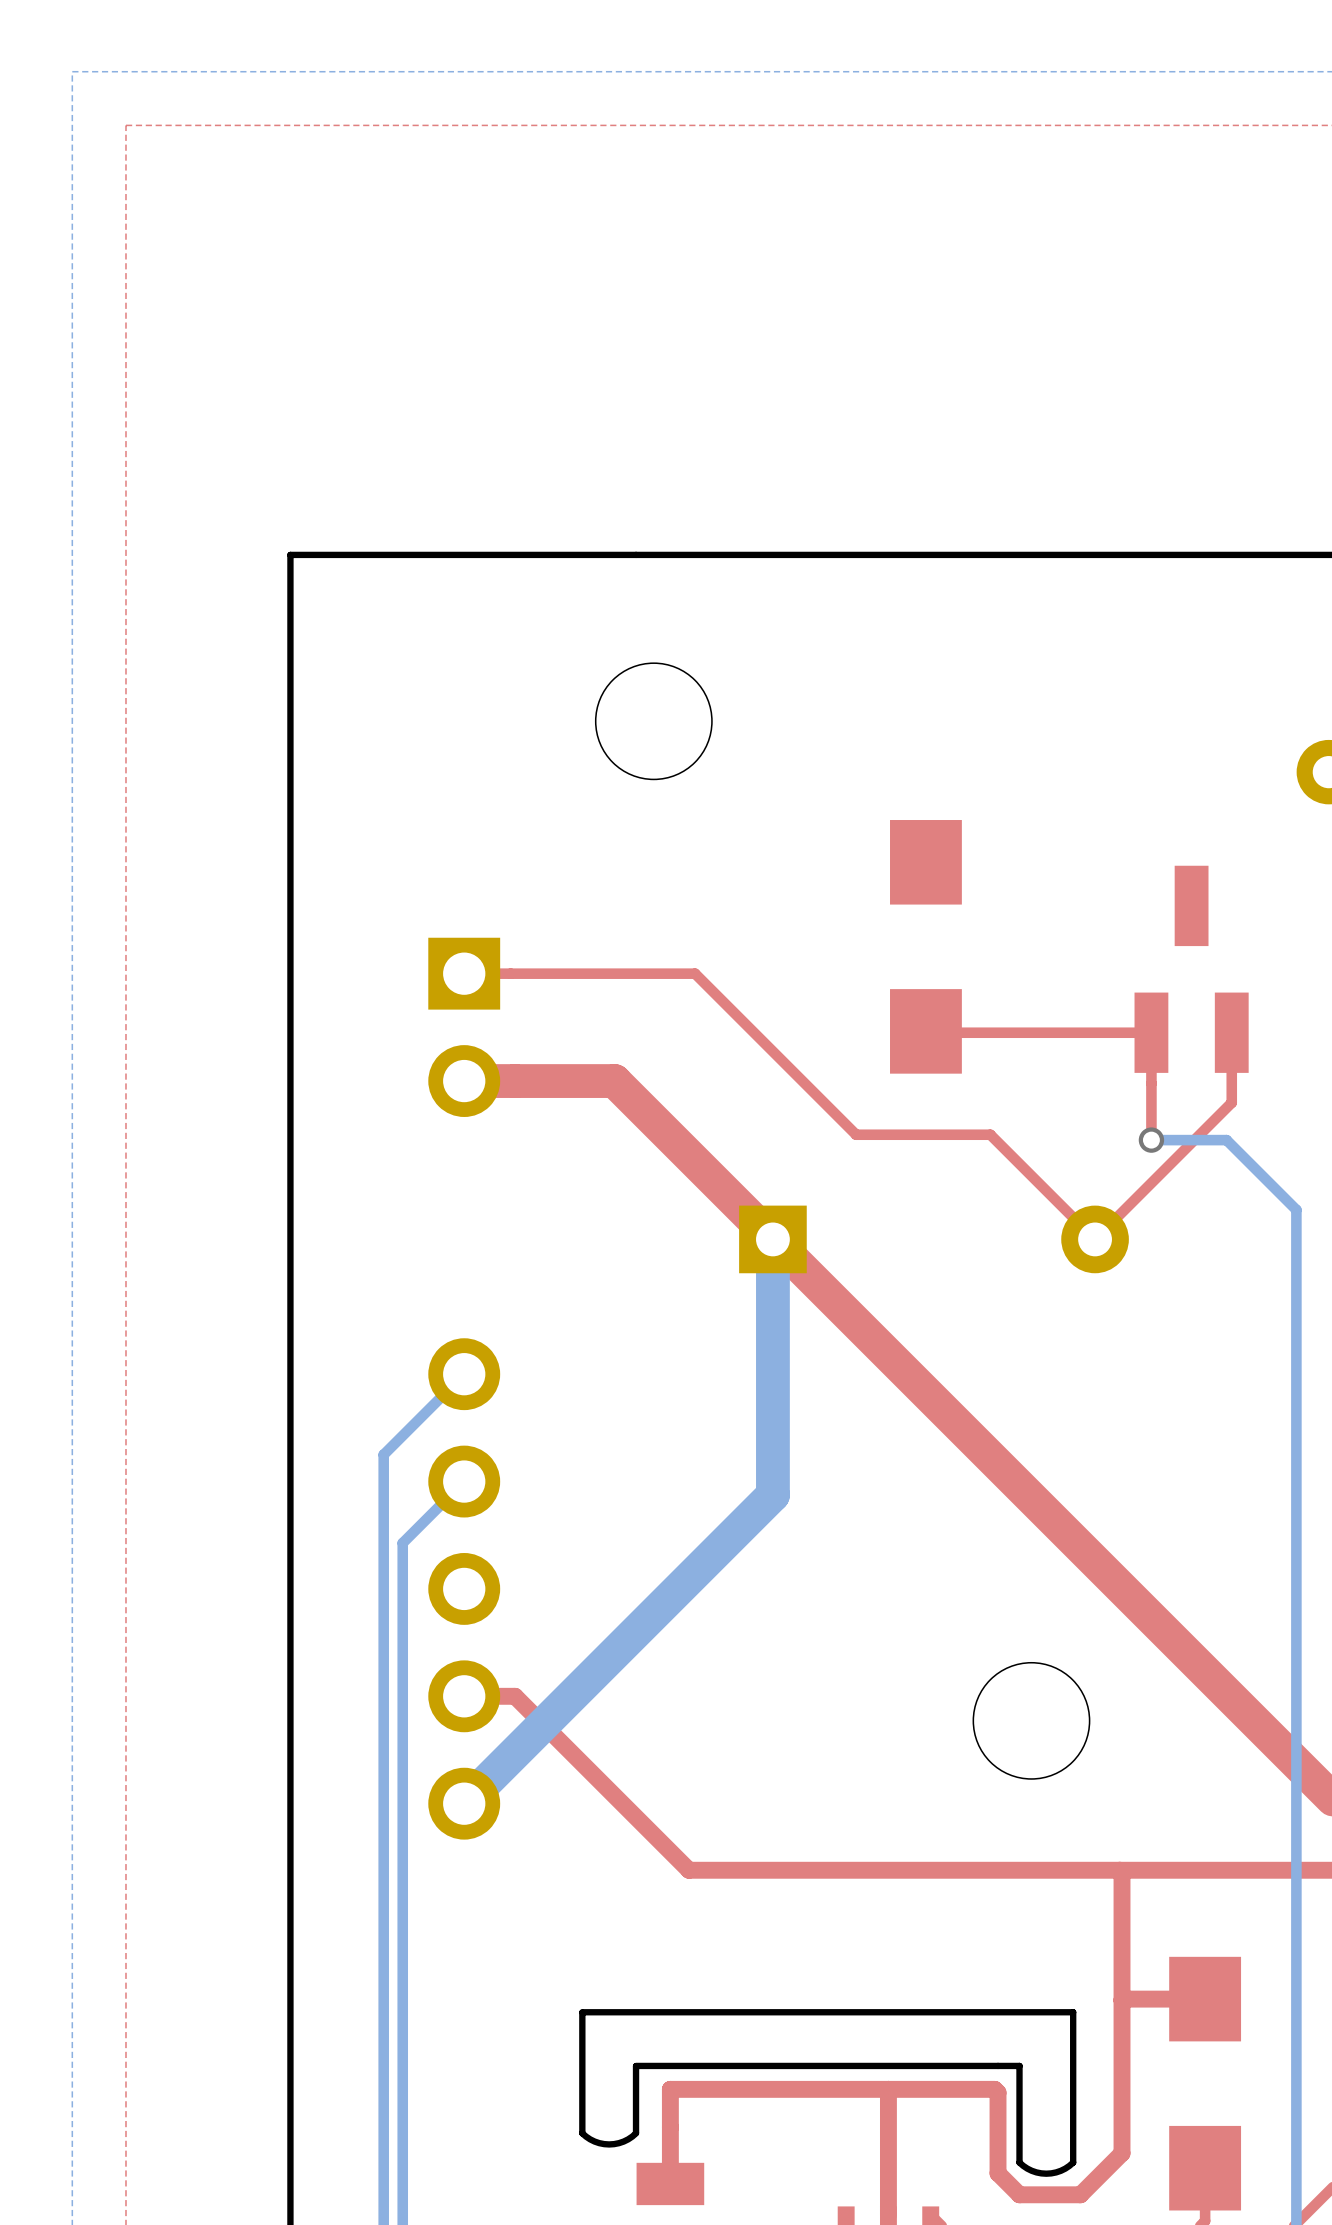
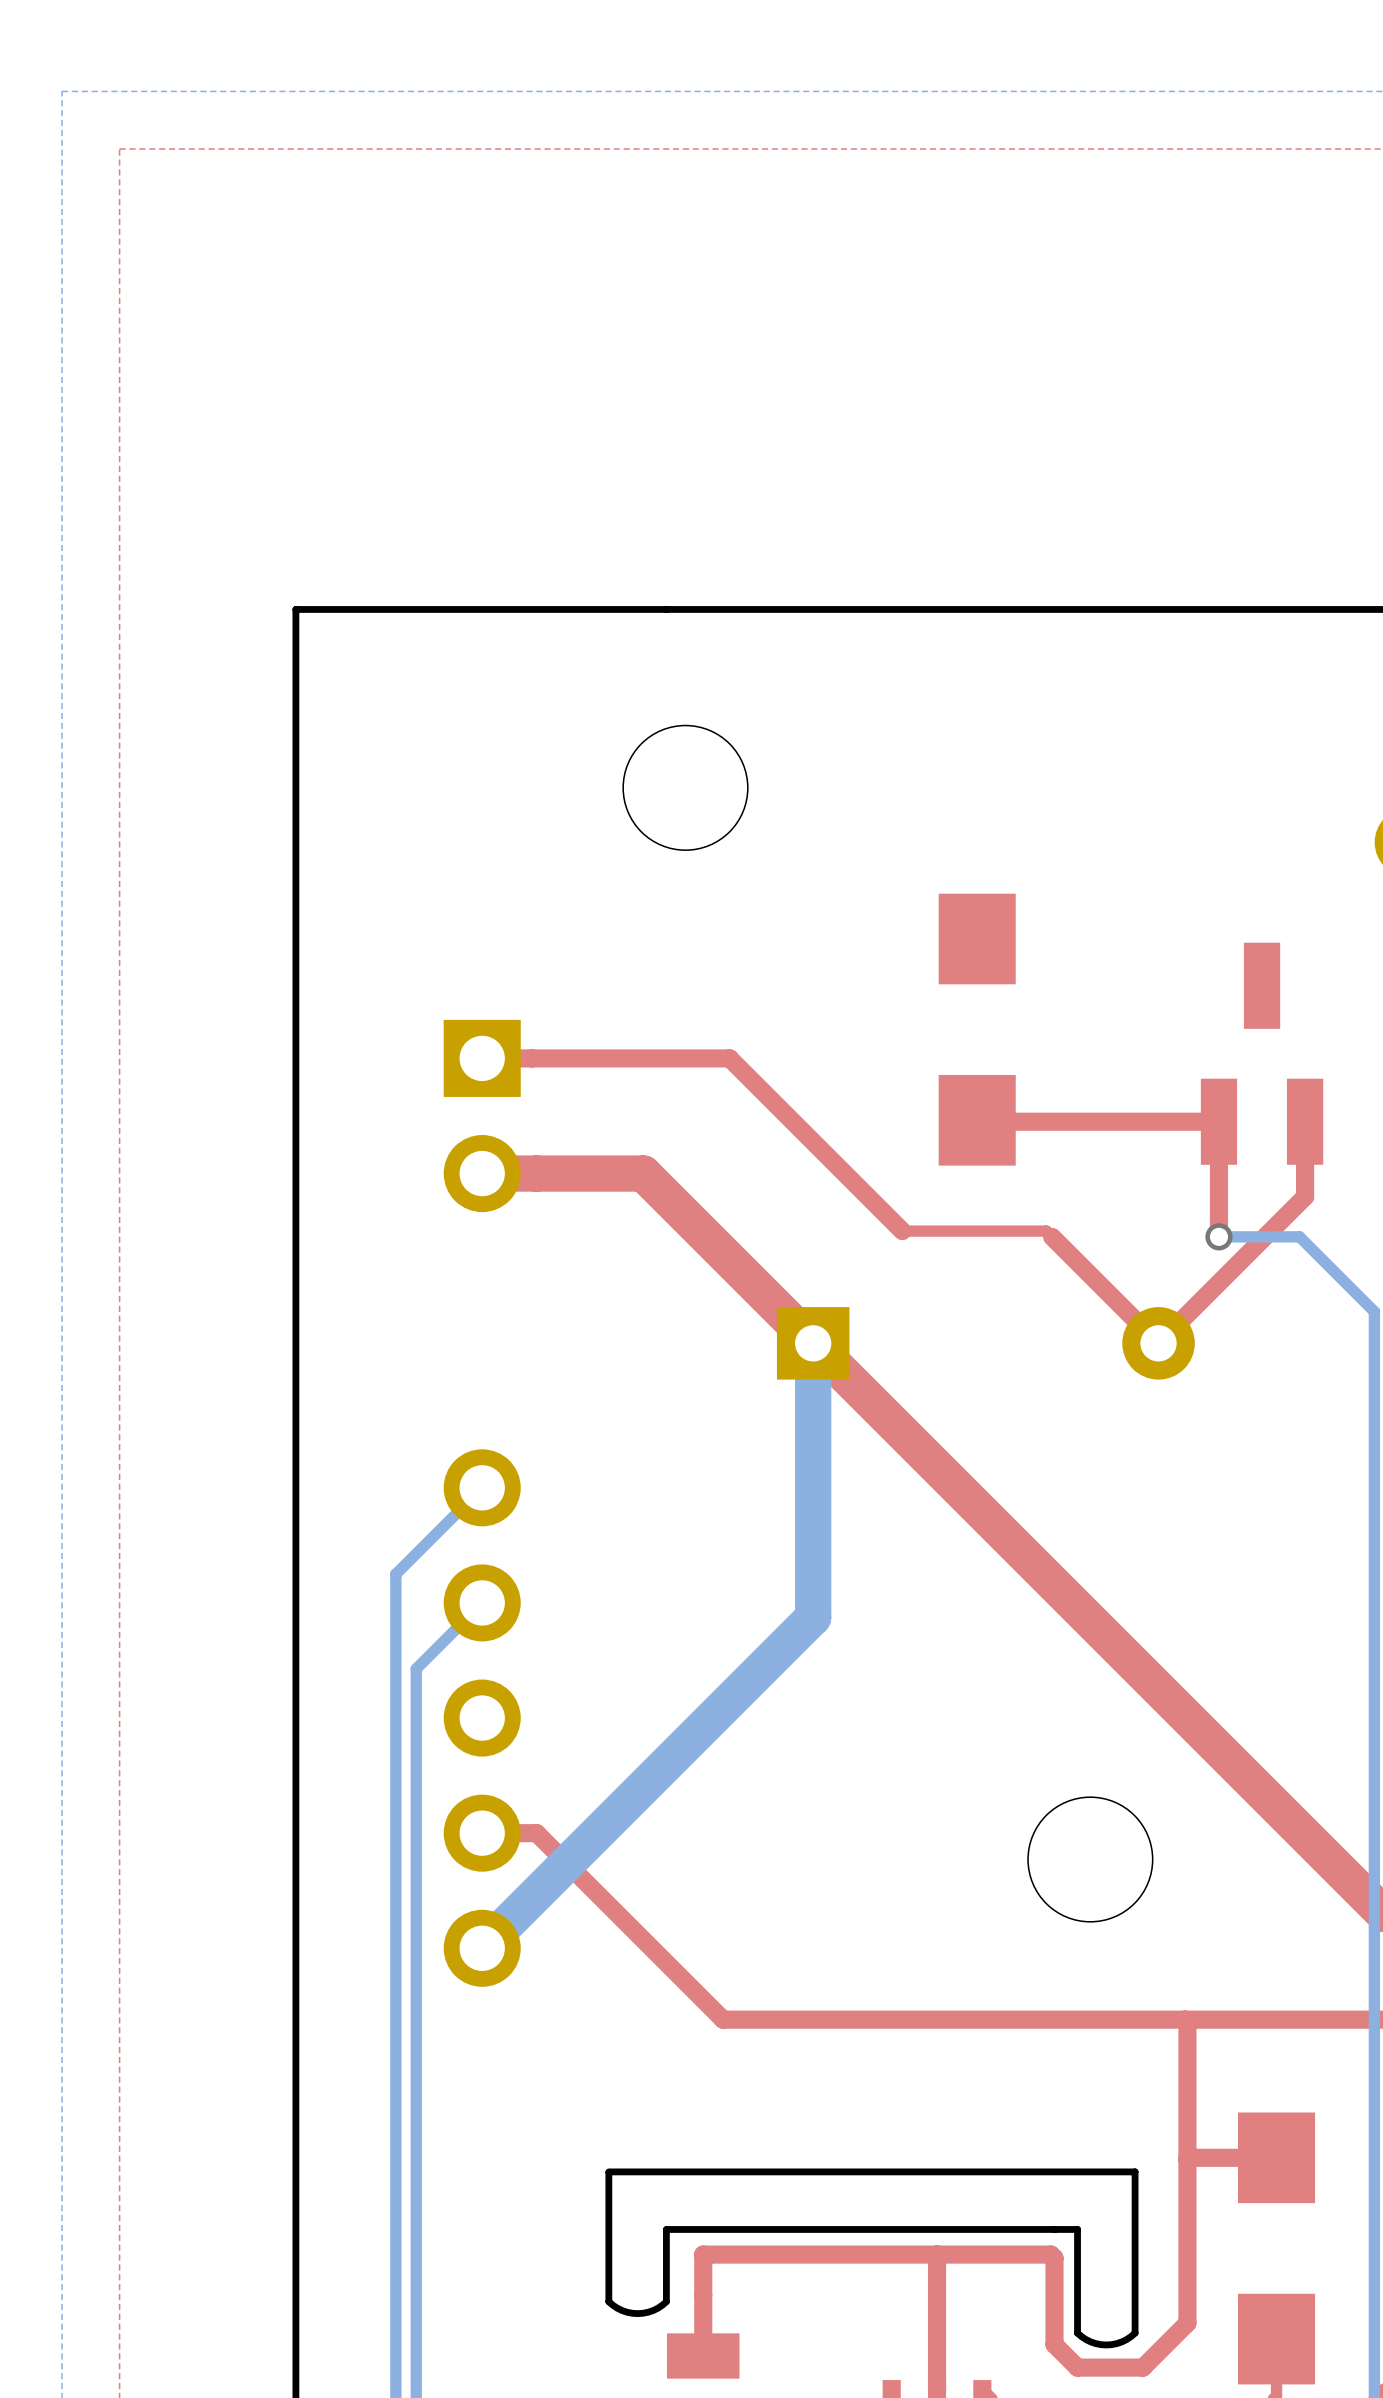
top track width: thin (464, 973) (695, 973) (856, 1134) -> thick (482, 1058) (729, 1058) (902, 1231)
top track width: thin (927, 1032) (1151, 1032) (1151, 1140) -> thick (978, 1121) (1218, 1121) (1218, 1236)
top track width: thin (1231, 1032) (1231, 1102) (1095, 1239) (995, 1140) -> thick (1305, 1121) (1305, 1196) (1158, 1343) (1052, 1236)

